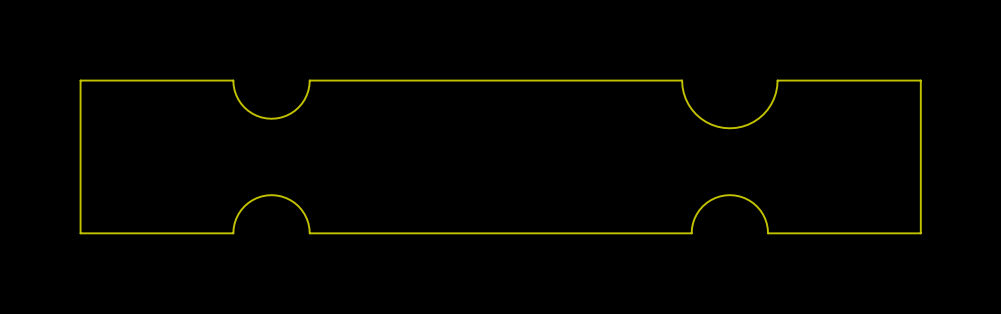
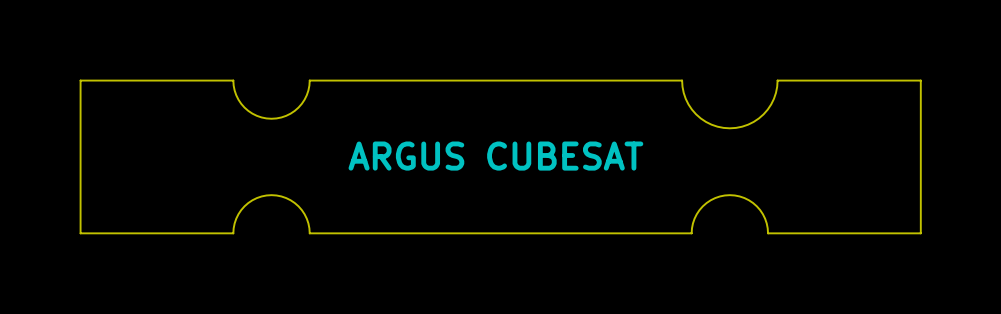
text: none -> ARGUS CUBESAT (495, 156)

